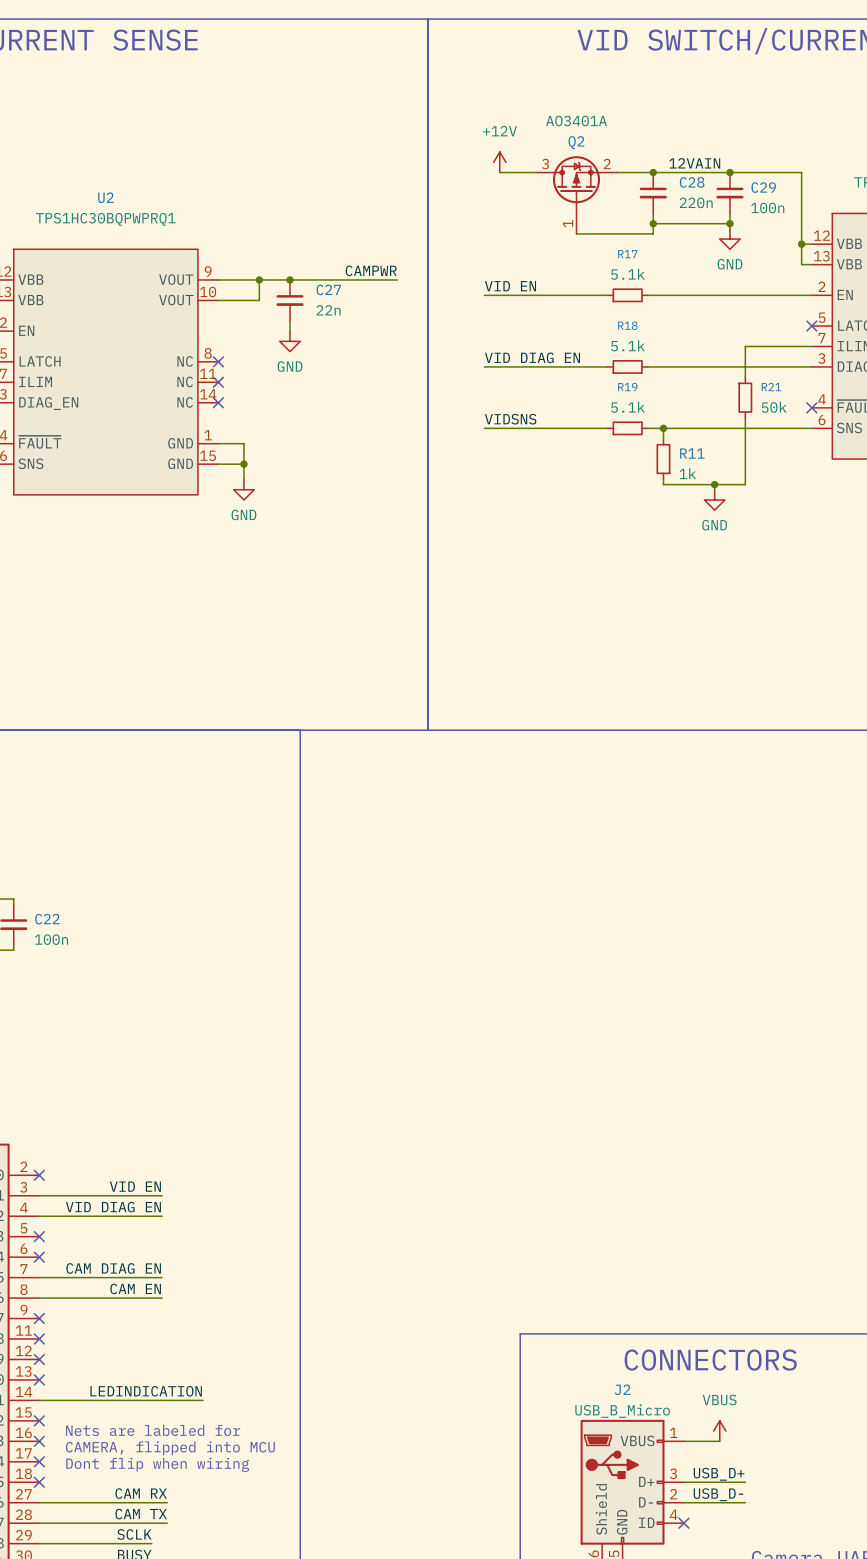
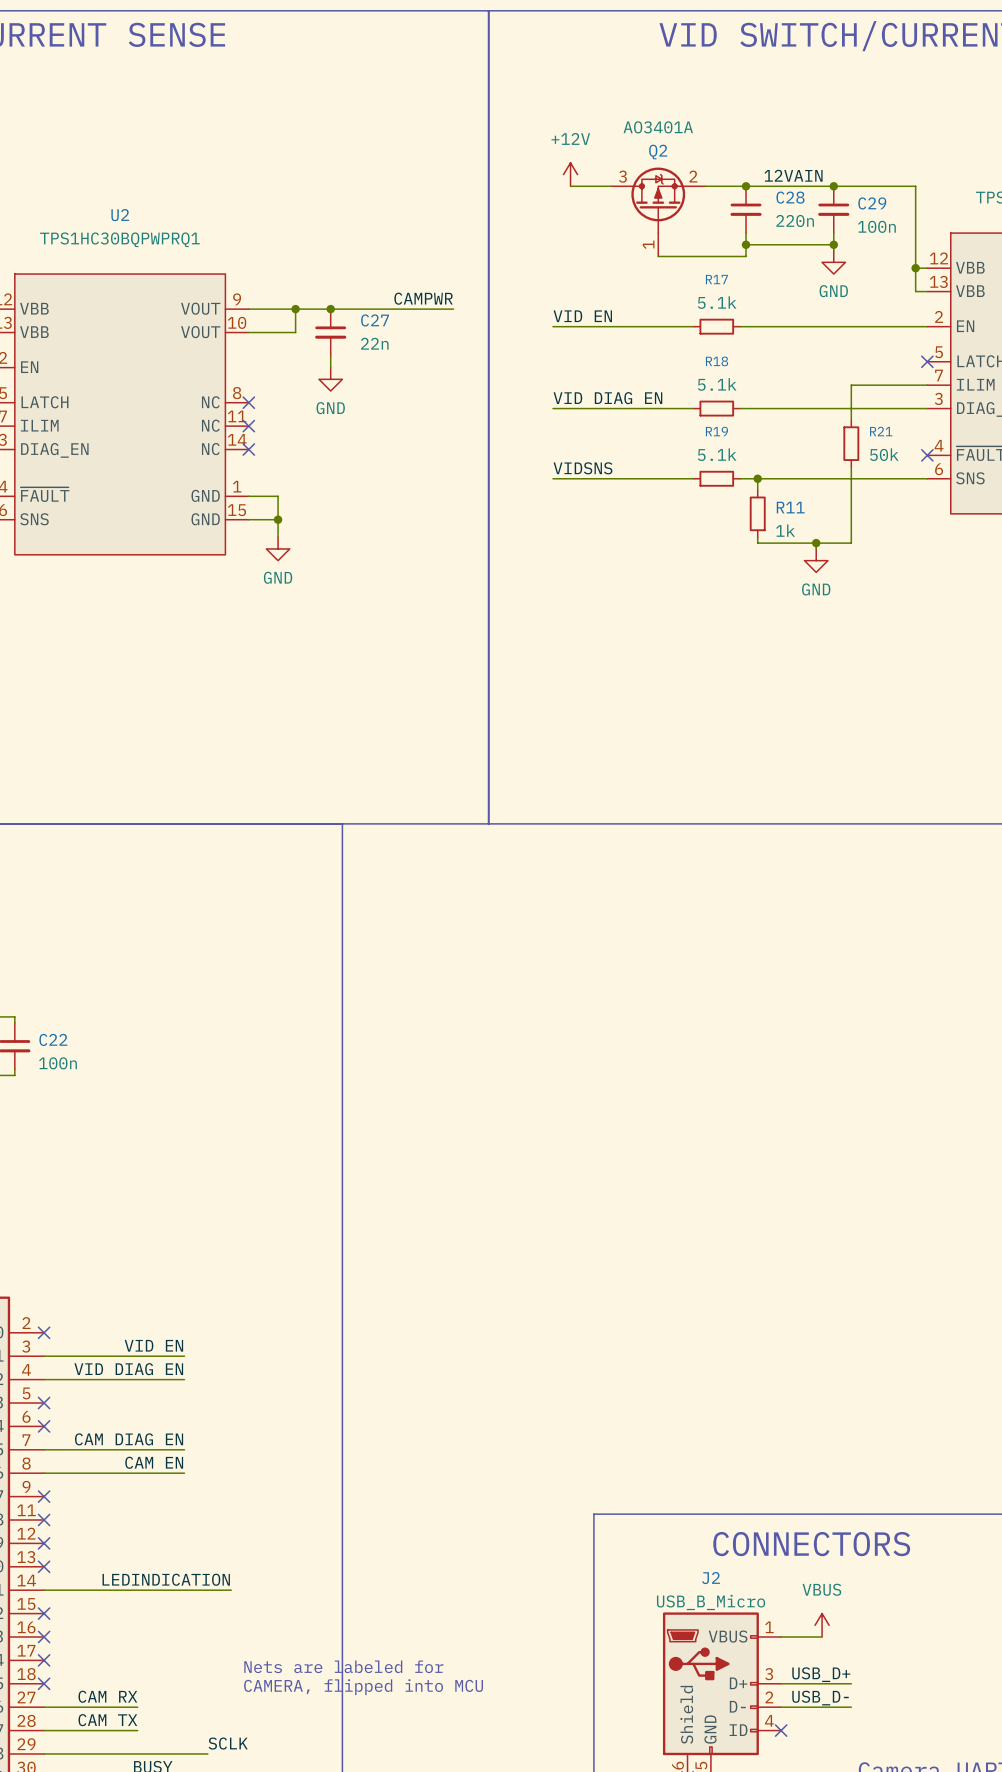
text position: Nets are labeled for (153, 1430) -> Nets are labeled for (343, 1666)
text position: CAMERA, flipped into MCU (170, 1448) -> CAMERA, flipped into MCU (363, 1687)
text: Dont flip when wiring (157, 1464) -> none
label position: CAM RX (141, 1493) -> CAM RX (107, 1696)
wire: (121, 1502) (167, 1502) -> none
label position: CAM TX (141, 1514) -> CAM TX (107, 1720)
wire: (121, 1523) (167, 1523) -> none
label position: SCLK (134, 1534) -> SCLK (228, 1743)
wire: none -> (172, 1753) (207, 1753)

